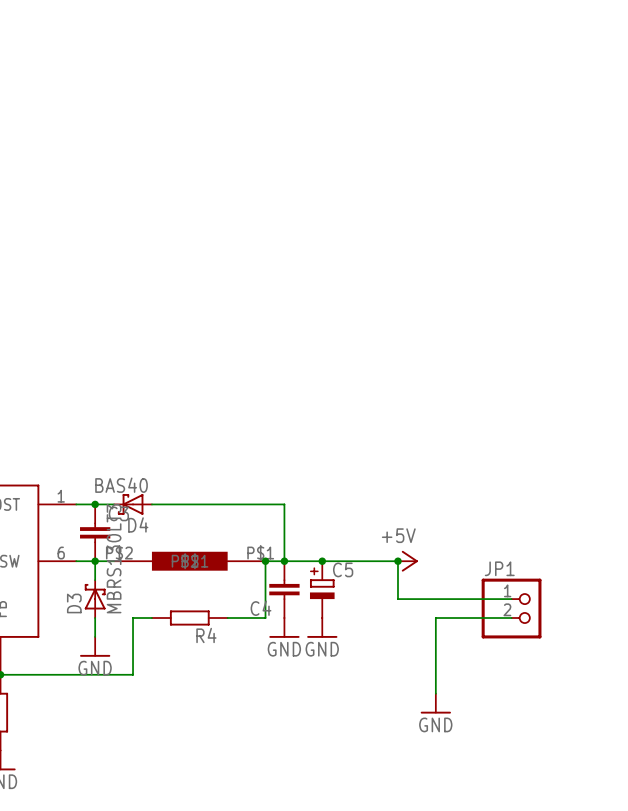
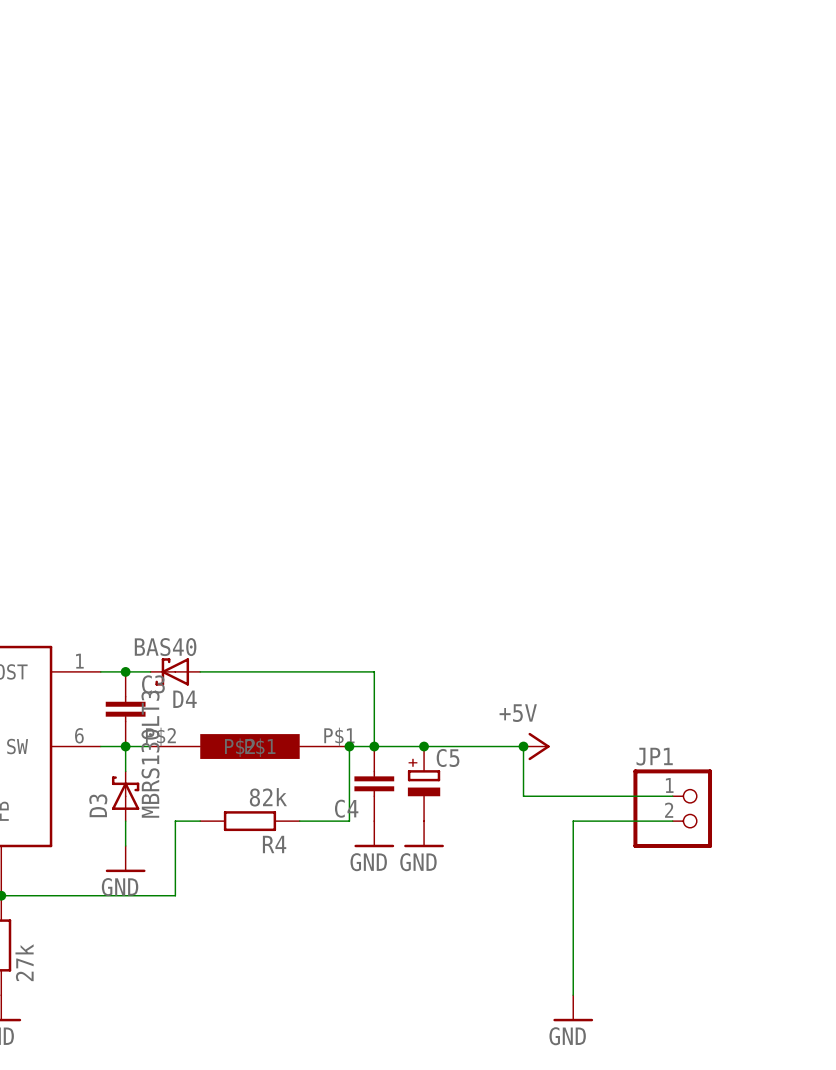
R4 value: none -> 82k (268, 797)
wire: none -> (573, 920) (573, 995)
power symbol position: GND (435, 703) -> GND (573, 1008)
part value: none -> 27k (24, 962)

